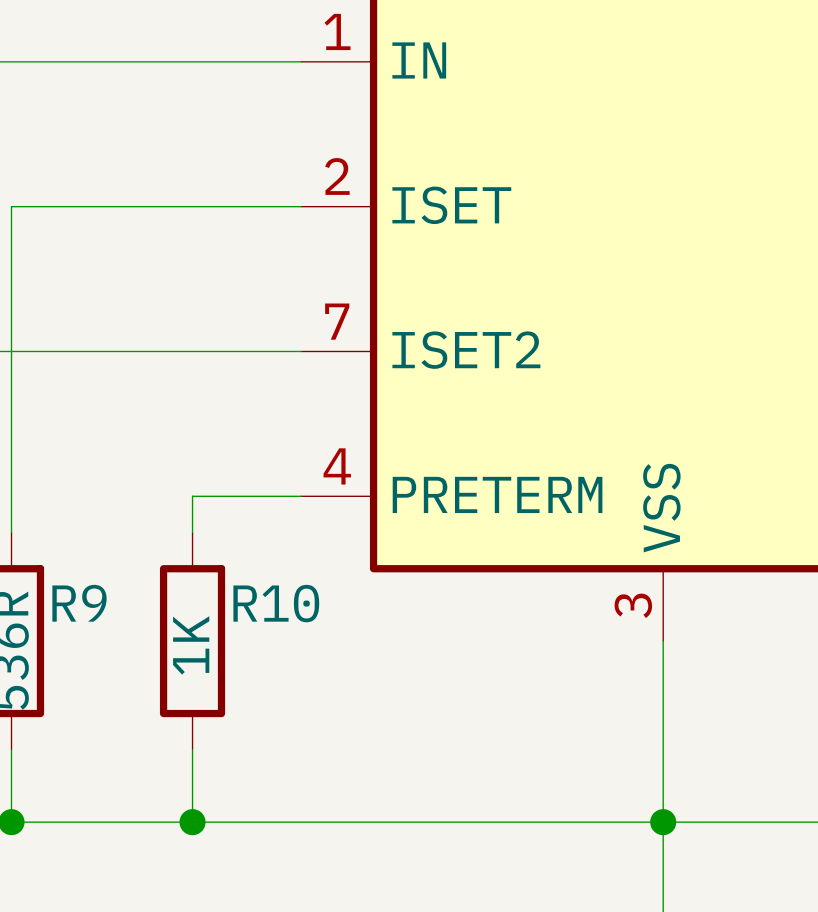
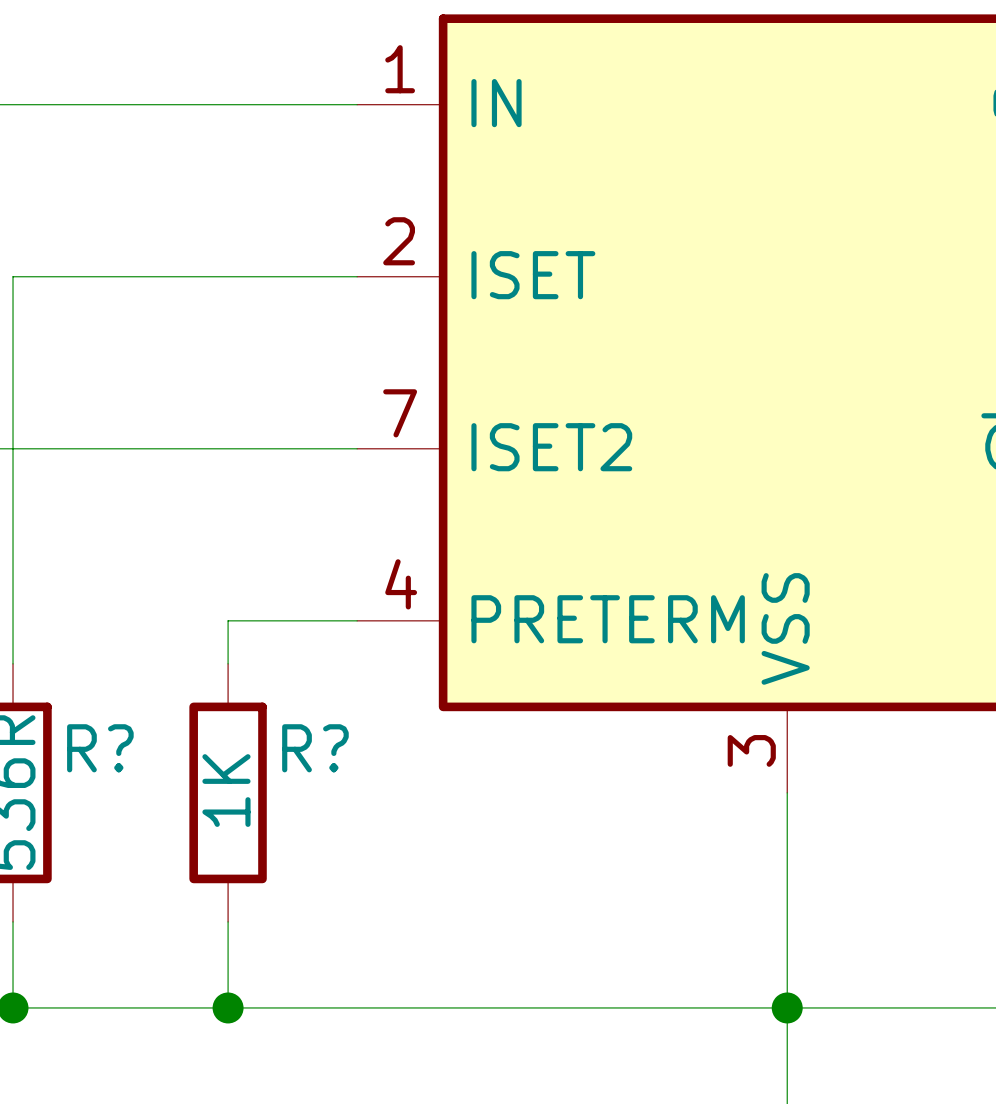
R9 name: R9 (79, 603) -> R? (100, 748)
R10 name: R10 (276, 603) -> R? (315, 748)

